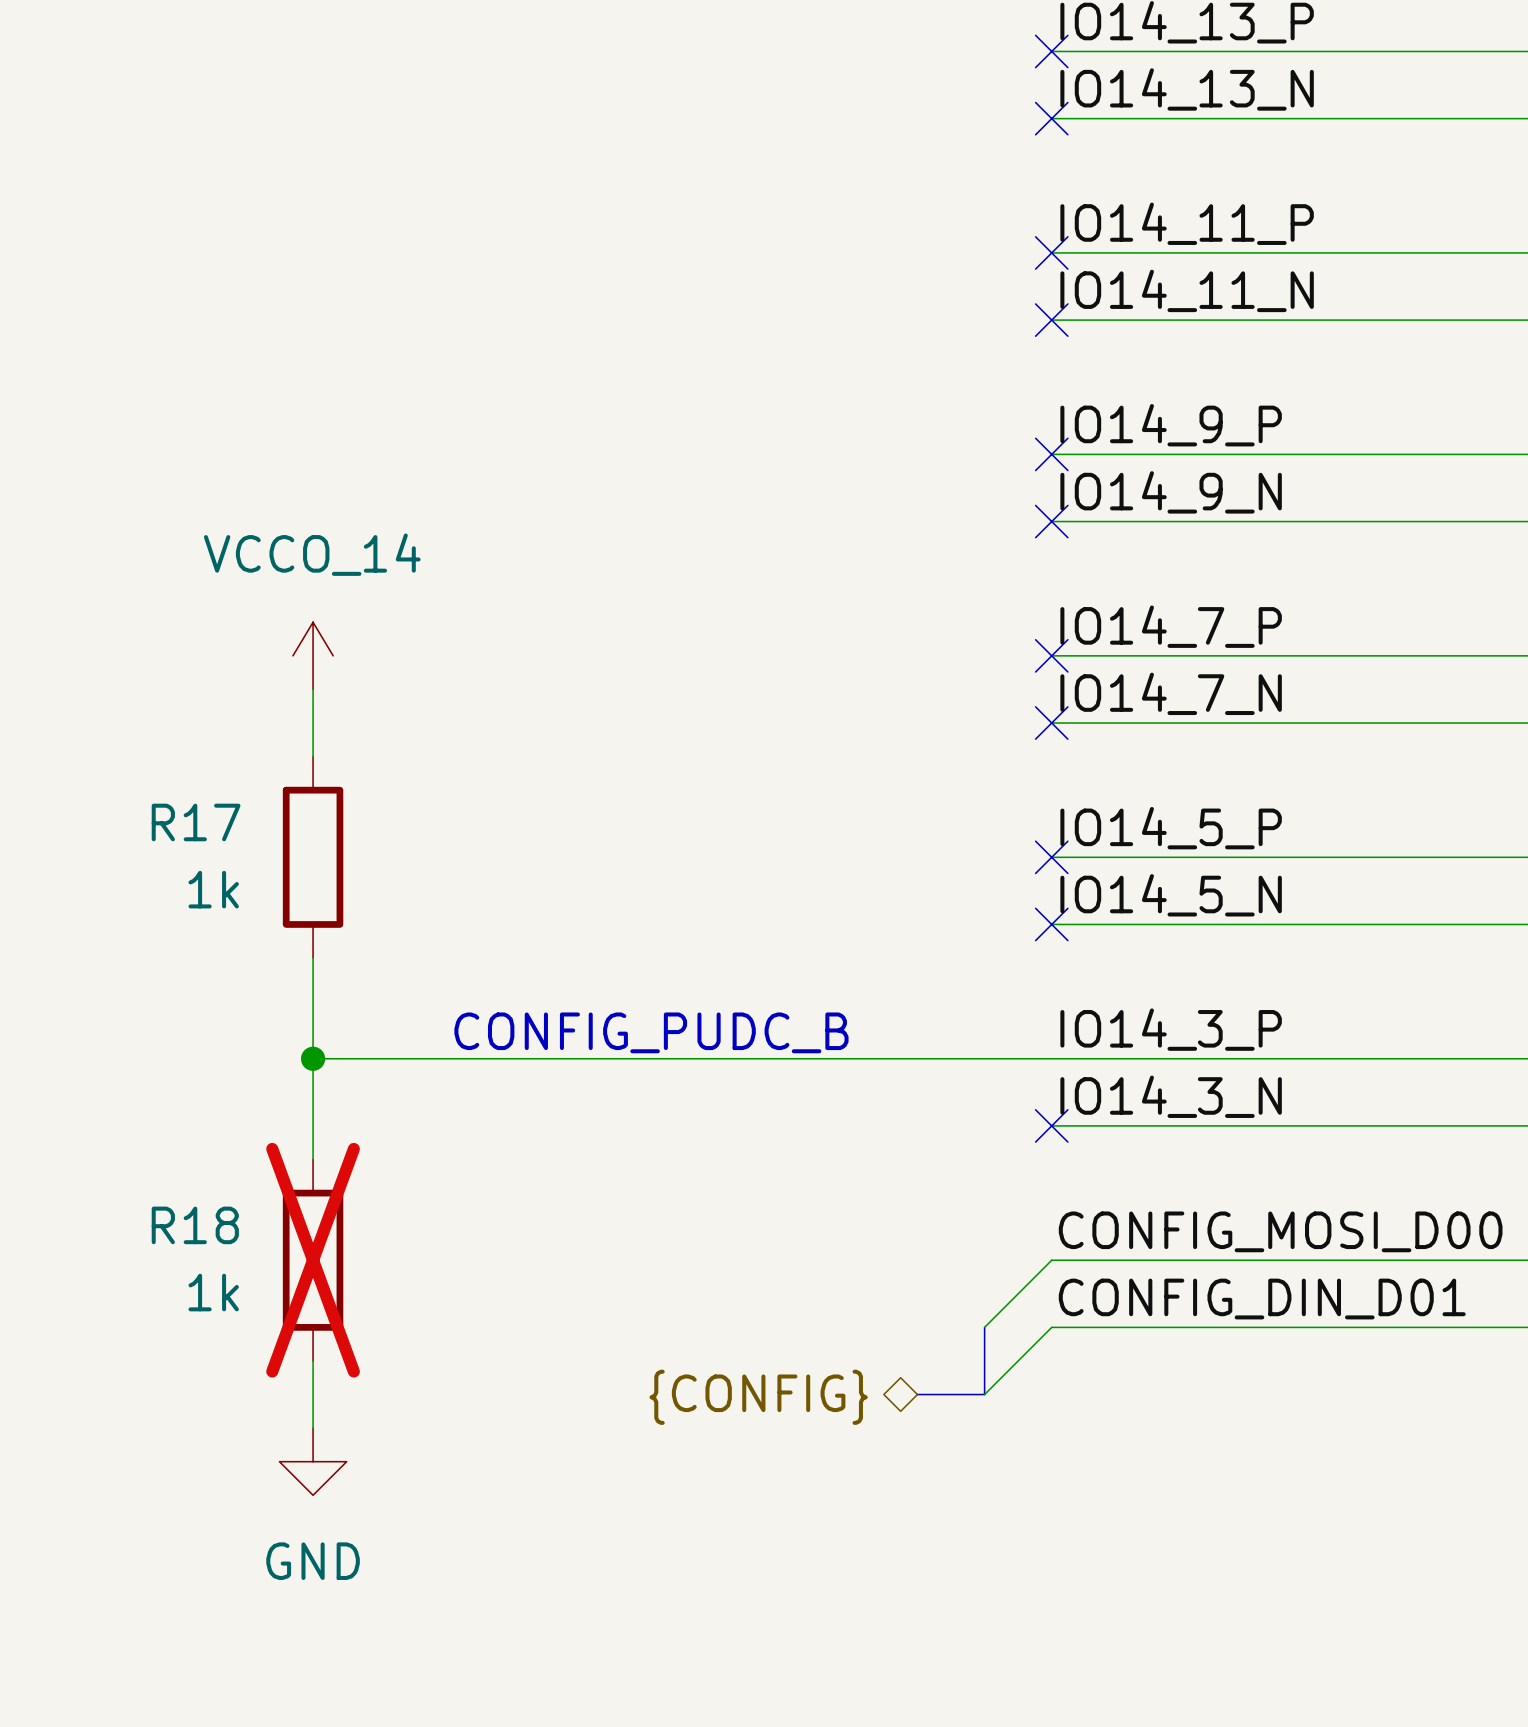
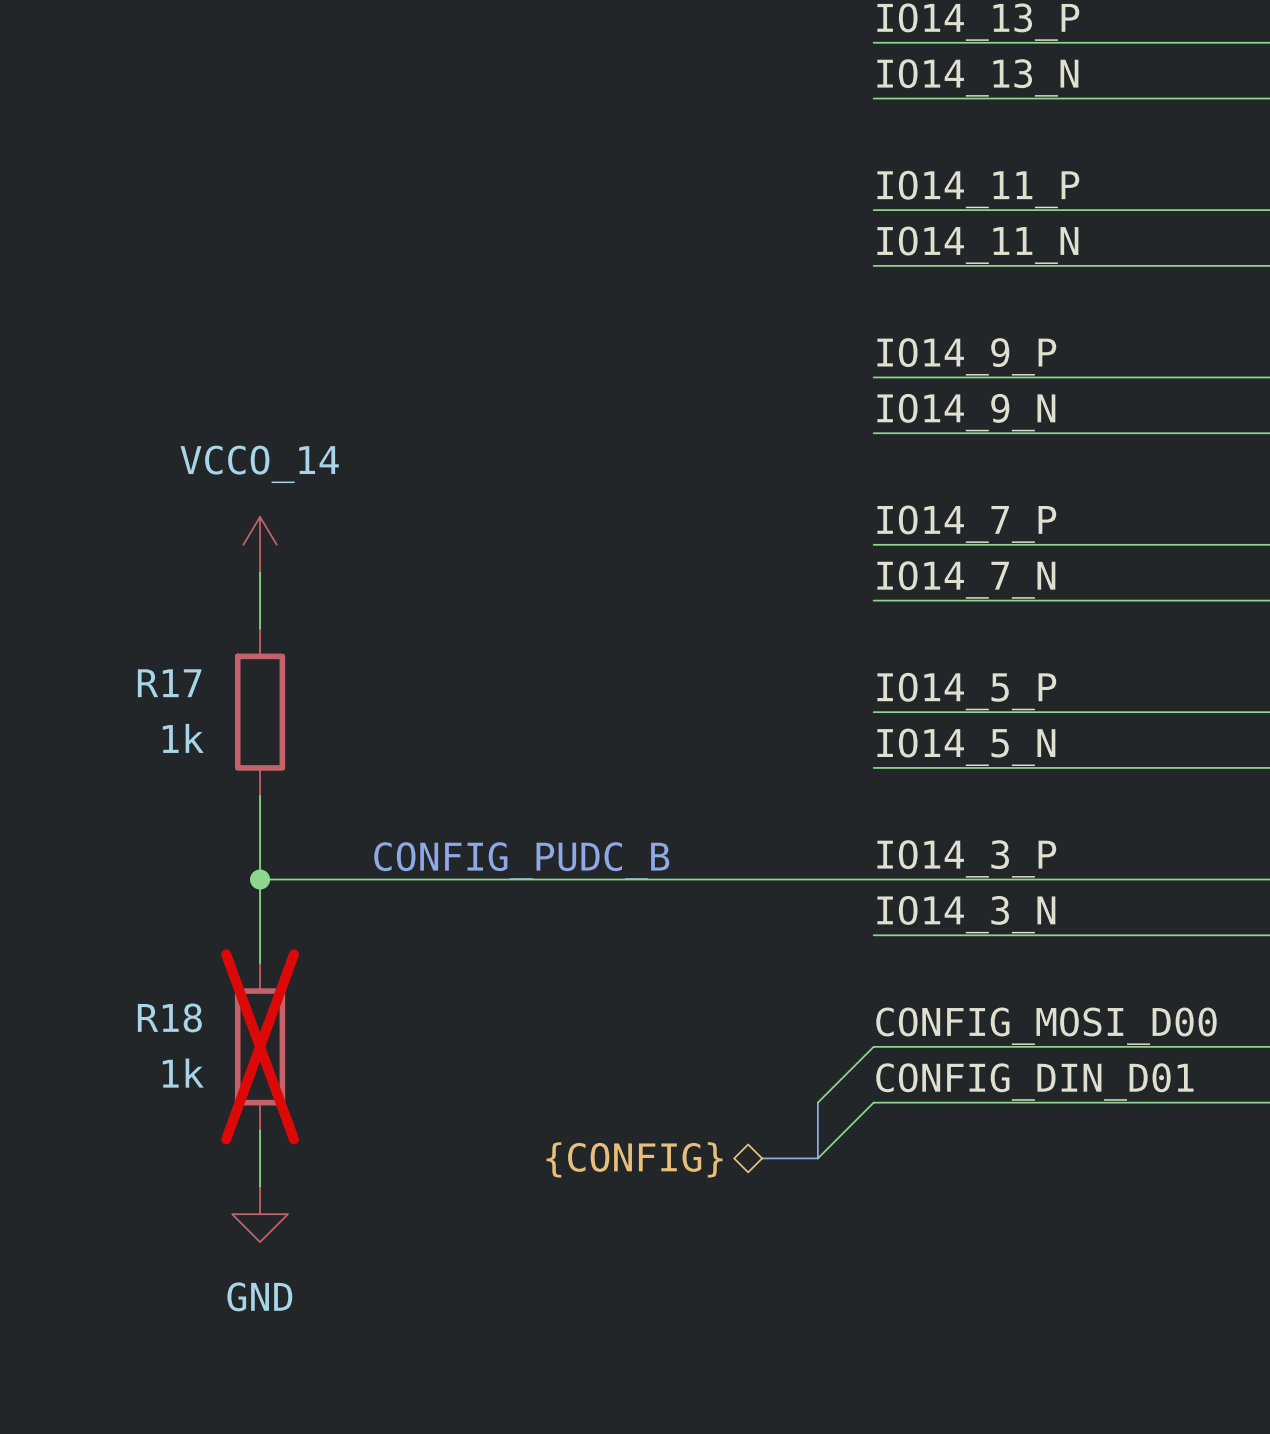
no-connect mark: (1051, 51) -> none
no-connect mark: (1051, 118) -> none
no-connect mark: (1051, 252) -> none
no-connect mark: (1051, 320) -> none
no-connect mark: (1051, 454) -> none
no-connect mark: (1051, 521) -> none
no-connect mark: (1051, 655) -> none
no-connect mark: (1051, 723) -> none
no-connect mark: (1051, 857) -> none
no-connect mark: (1051, 924) -> none
no-connect mark: (1051, 1125) -> none

